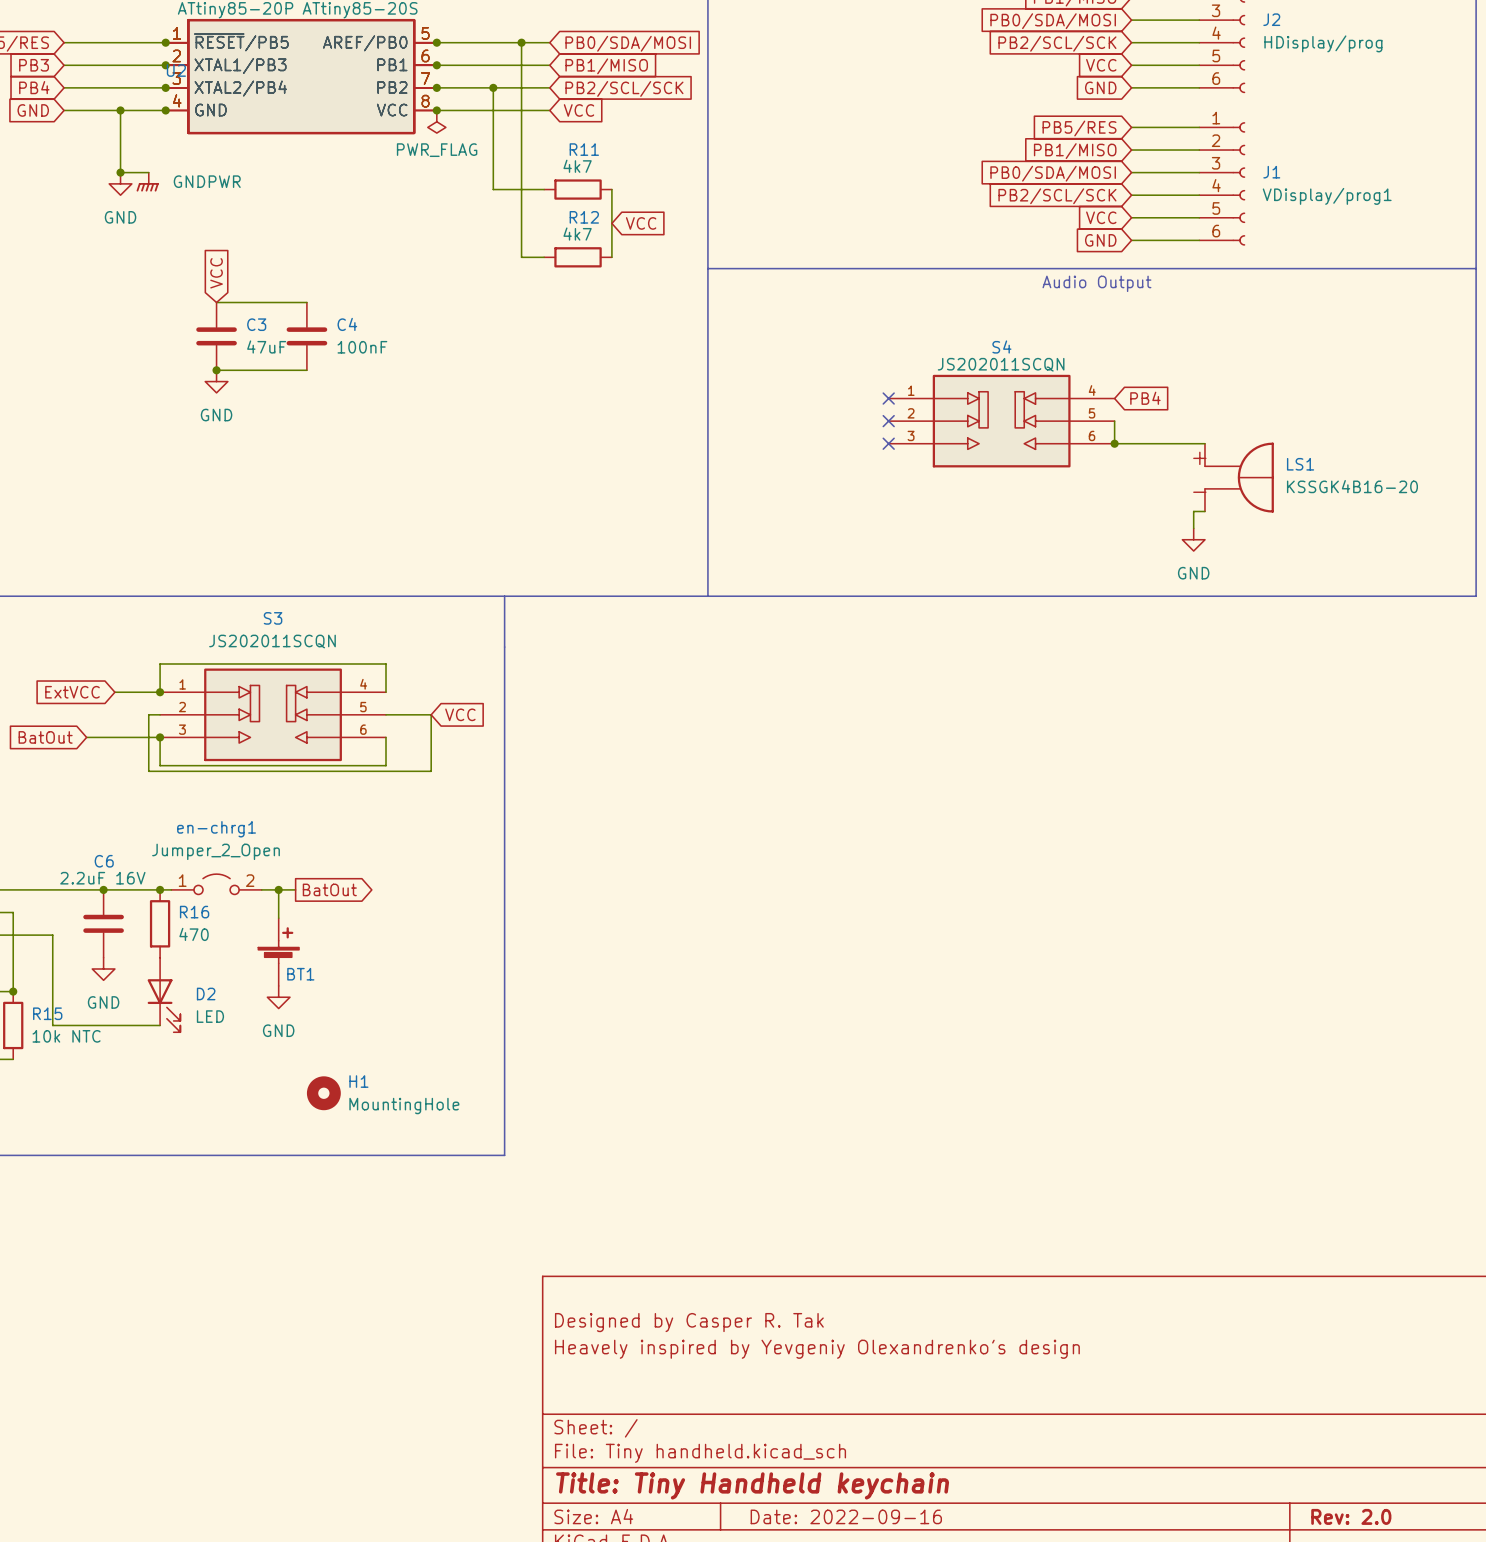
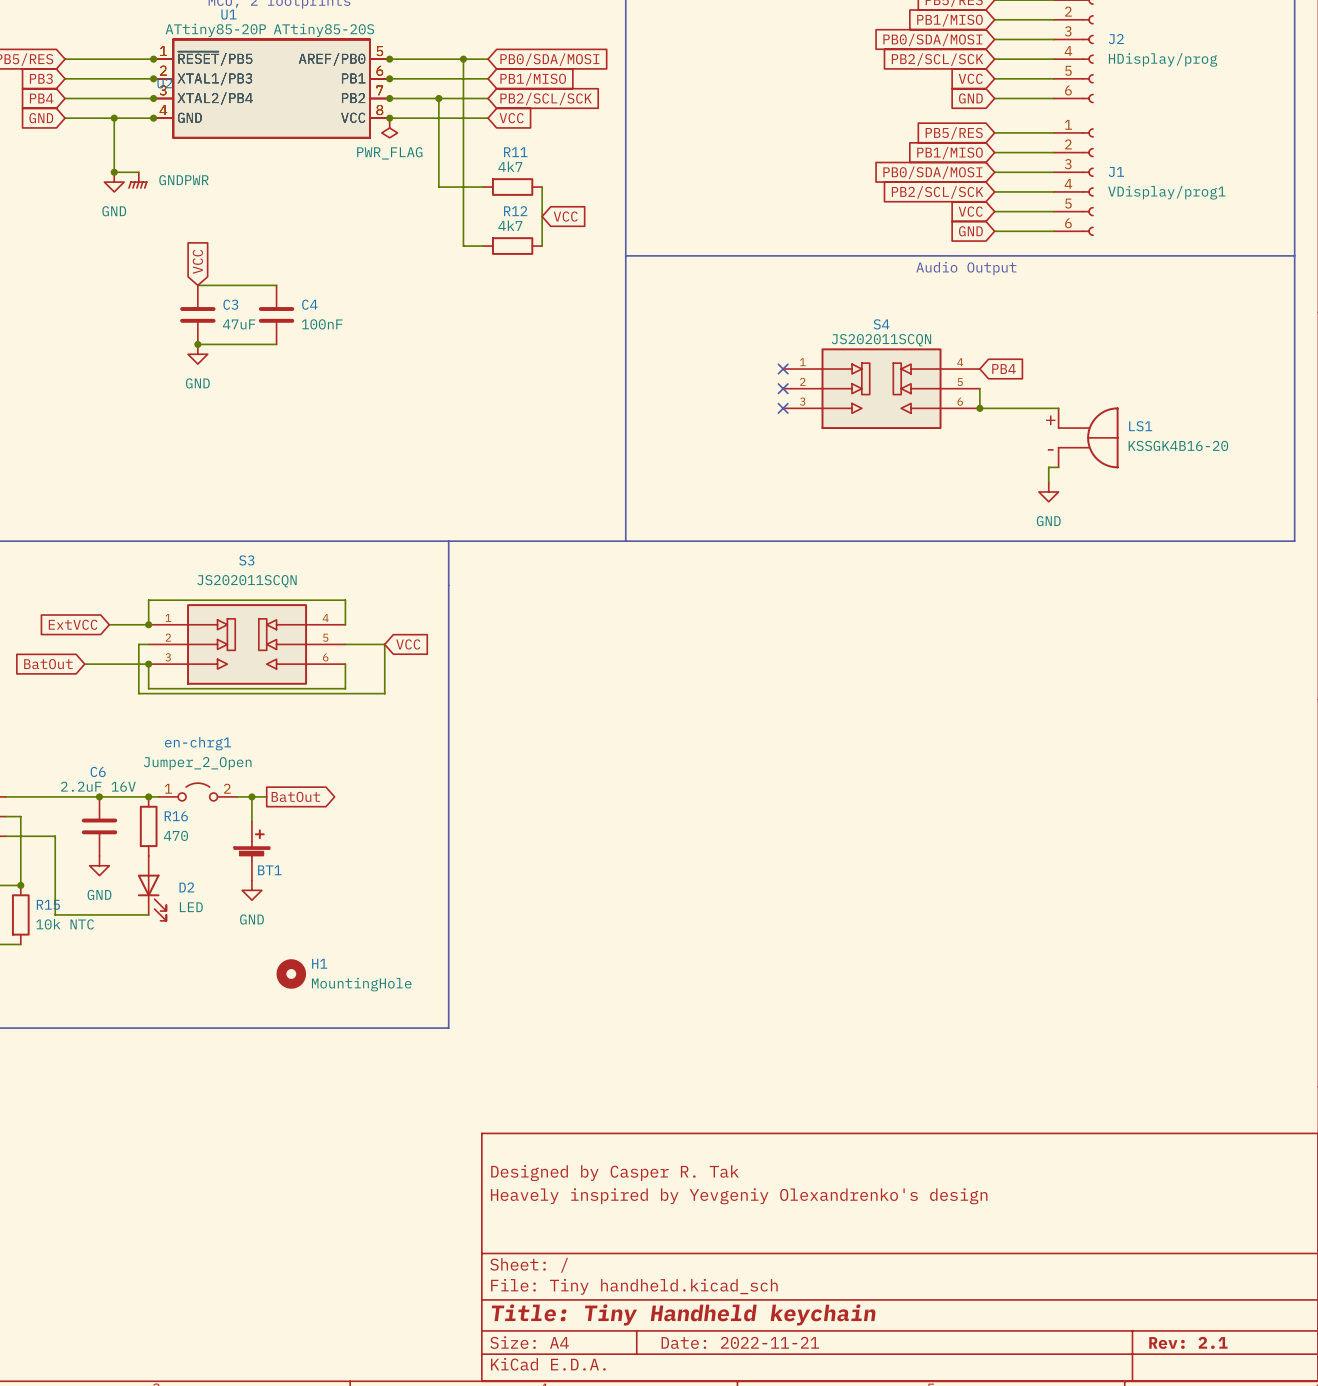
title block: Date: 2022-09-16 (846, 1516) -> Date: 2022-11-21 (740, 1342)
title block: Rev: 2.0 (1351, 1516) -> Rev: 2.1 (1188, 1342)

